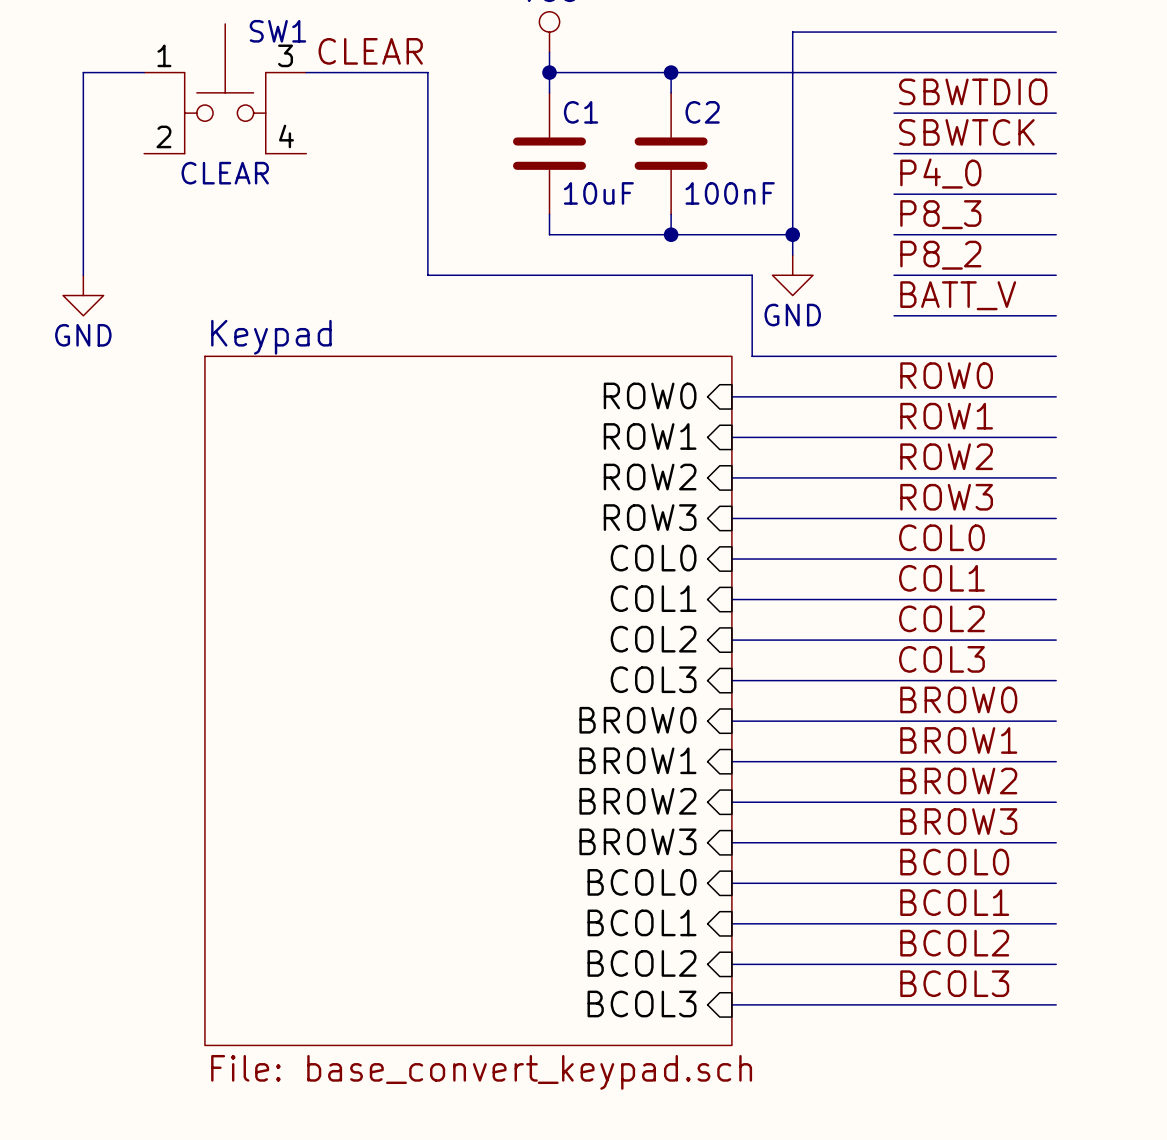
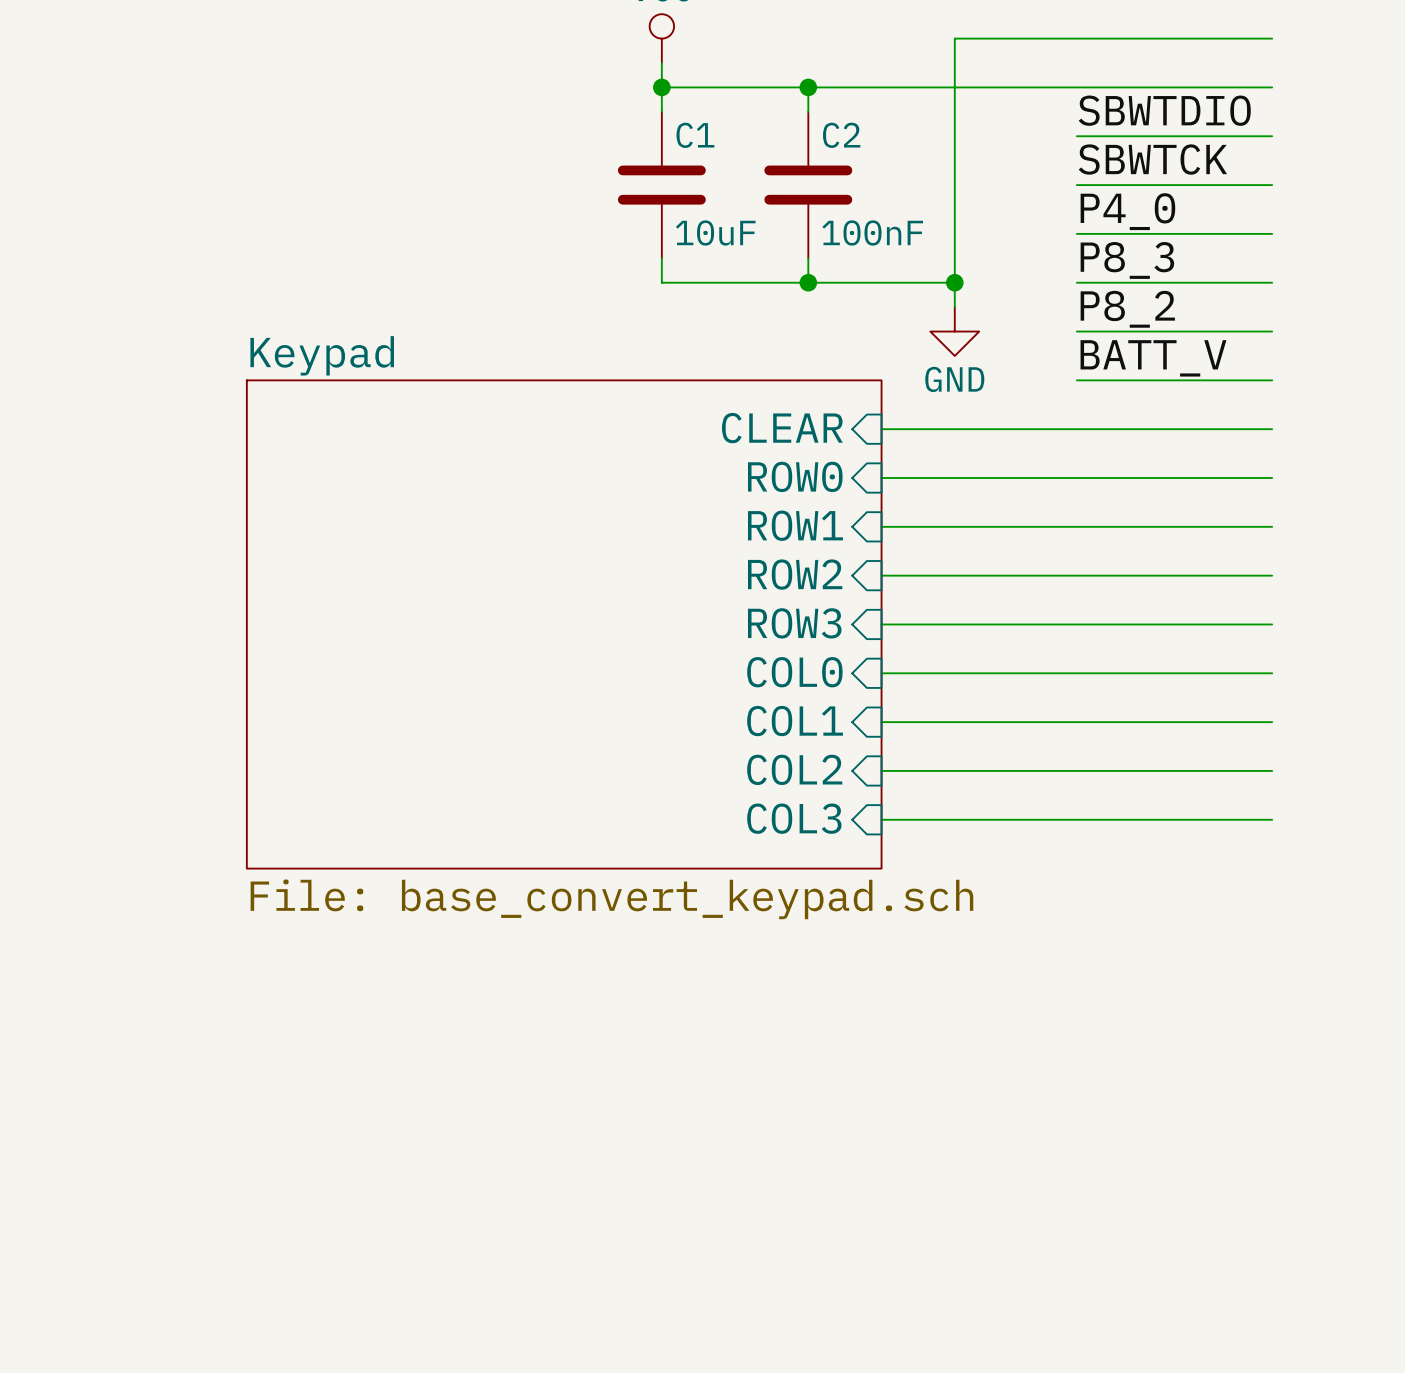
label: CLEAR (370, 51) -> none
wire: (144, 72) (83, 72) (83, 275) -> none
wire: (306, 72) (427, 72) (427, 275) (752, 275) (752, 356) -> (881, 429) (905, 429)
SW1: CLEAR (225, 88) -> none
power symbol: GND (83, 295) -> none
sheet pin: none -> CLEAR (782, 428)
label: ROW0 (946, 375) -> none
label: ROW1 (946, 416) -> none
label: ROW2 (946, 456) -> none
label: ROW3 (946, 497) -> none
sheet Keypad: none -> File: base_convert_keypad.sch (564, 624)
label: COL0 (941, 537) -> none
label: COL1 (941, 578) -> none
label: COL2 (941, 618) -> none
label: COL3 (941, 659) -> none
label: BROW0 (958, 699) -> none
sheet Keypad: File: base_convert_keypad.sch (468, 700) -> none
sheet pin: BROW0 (637, 720) -> none
wire: (731, 721) (1056, 721) -> none
label: BROW1 (958, 740) -> none
sheet pin: BROW1 (637, 760) -> none
wire: (731, 761) (1056, 761) -> none
label: BROW2 (958, 781) -> none
sheet pin: BROW2 (637, 801) -> none
wire: (731, 802) (1056, 802) -> none
label: BROW3 (958, 821) -> none
sheet pin: BROW3 (637, 841) -> none
wire: (731, 842) (1056, 842) -> none
label: BCOL0 (954, 862) -> none
sheet pin: BCOL0 (642, 882) -> none
wire: (731, 883) (1056, 883) -> none
label: BCOL1 (954, 902) -> none
sheet pin: BCOL1 (642, 922) -> none
wire: (731, 923) (1056, 923) -> none
label: BCOL2 (954, 943) -> none
sheet pin: BCOL2 (642, 963) -> none
wire: (731, 964) (1056, 964) -> none
label: BCOL3 (954, 983) -> none
sheet pin: BCOL3 (642, 1003) -> none
wire: (731, 1004) (1056, 1004) -> none

